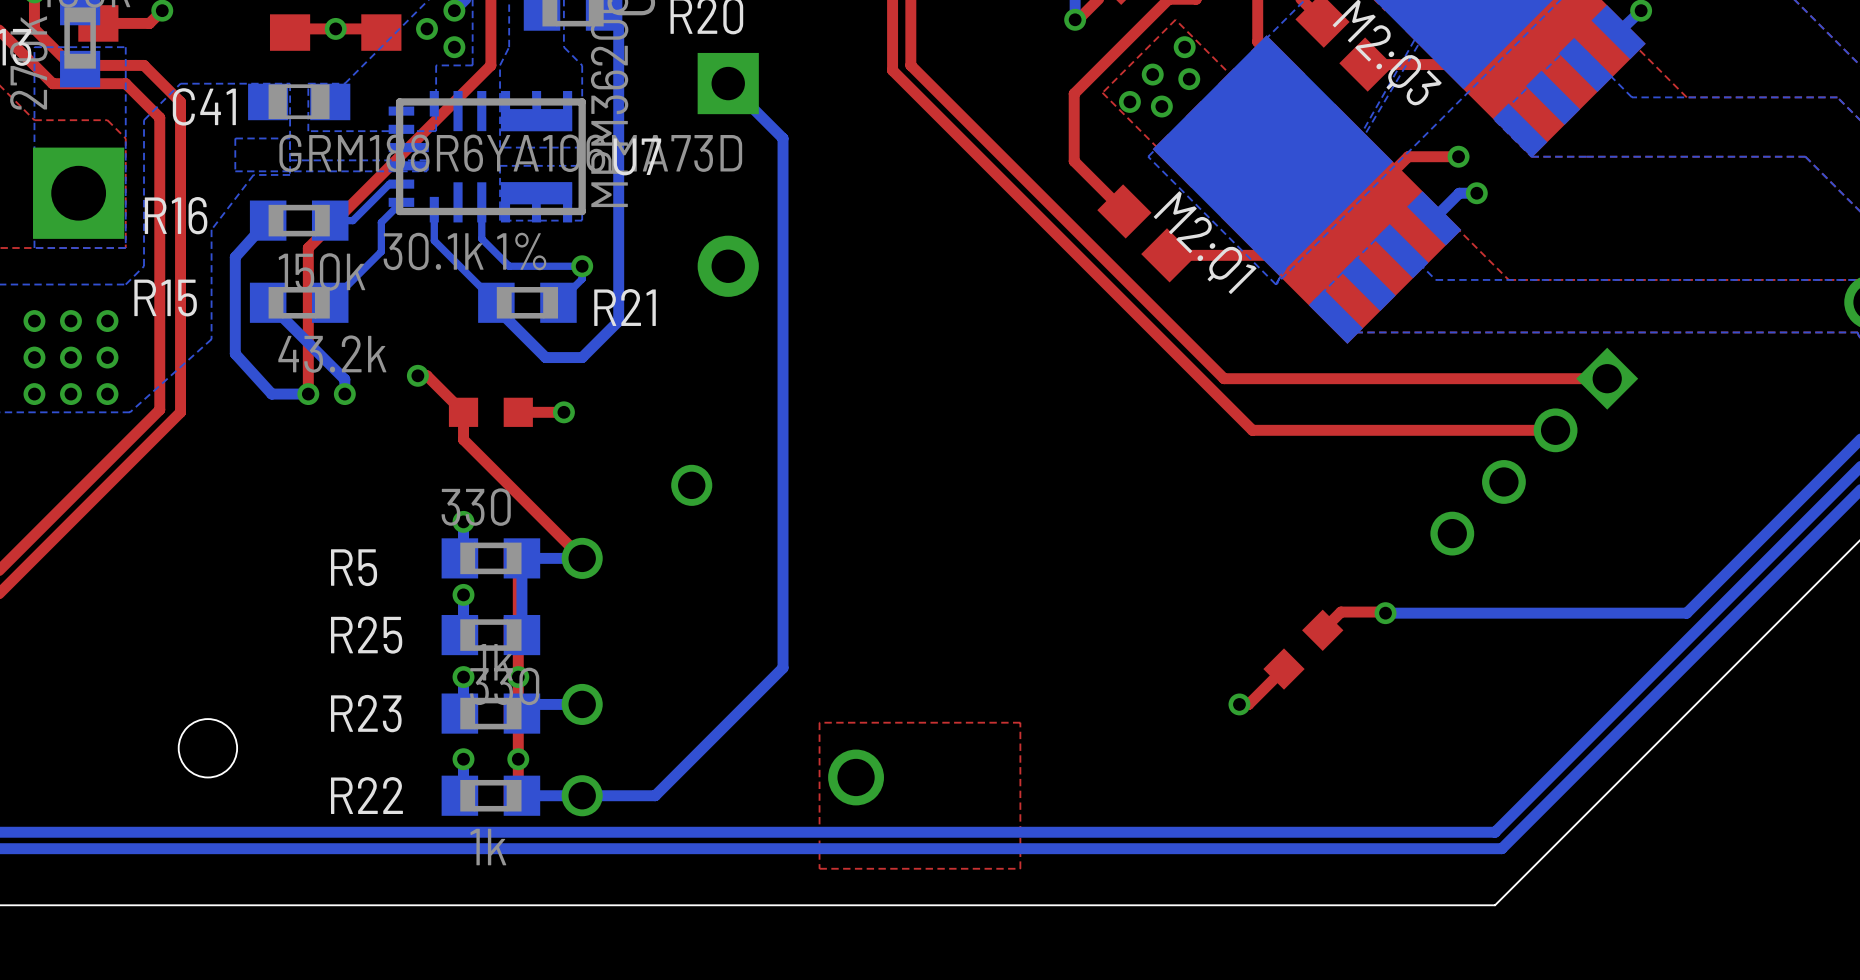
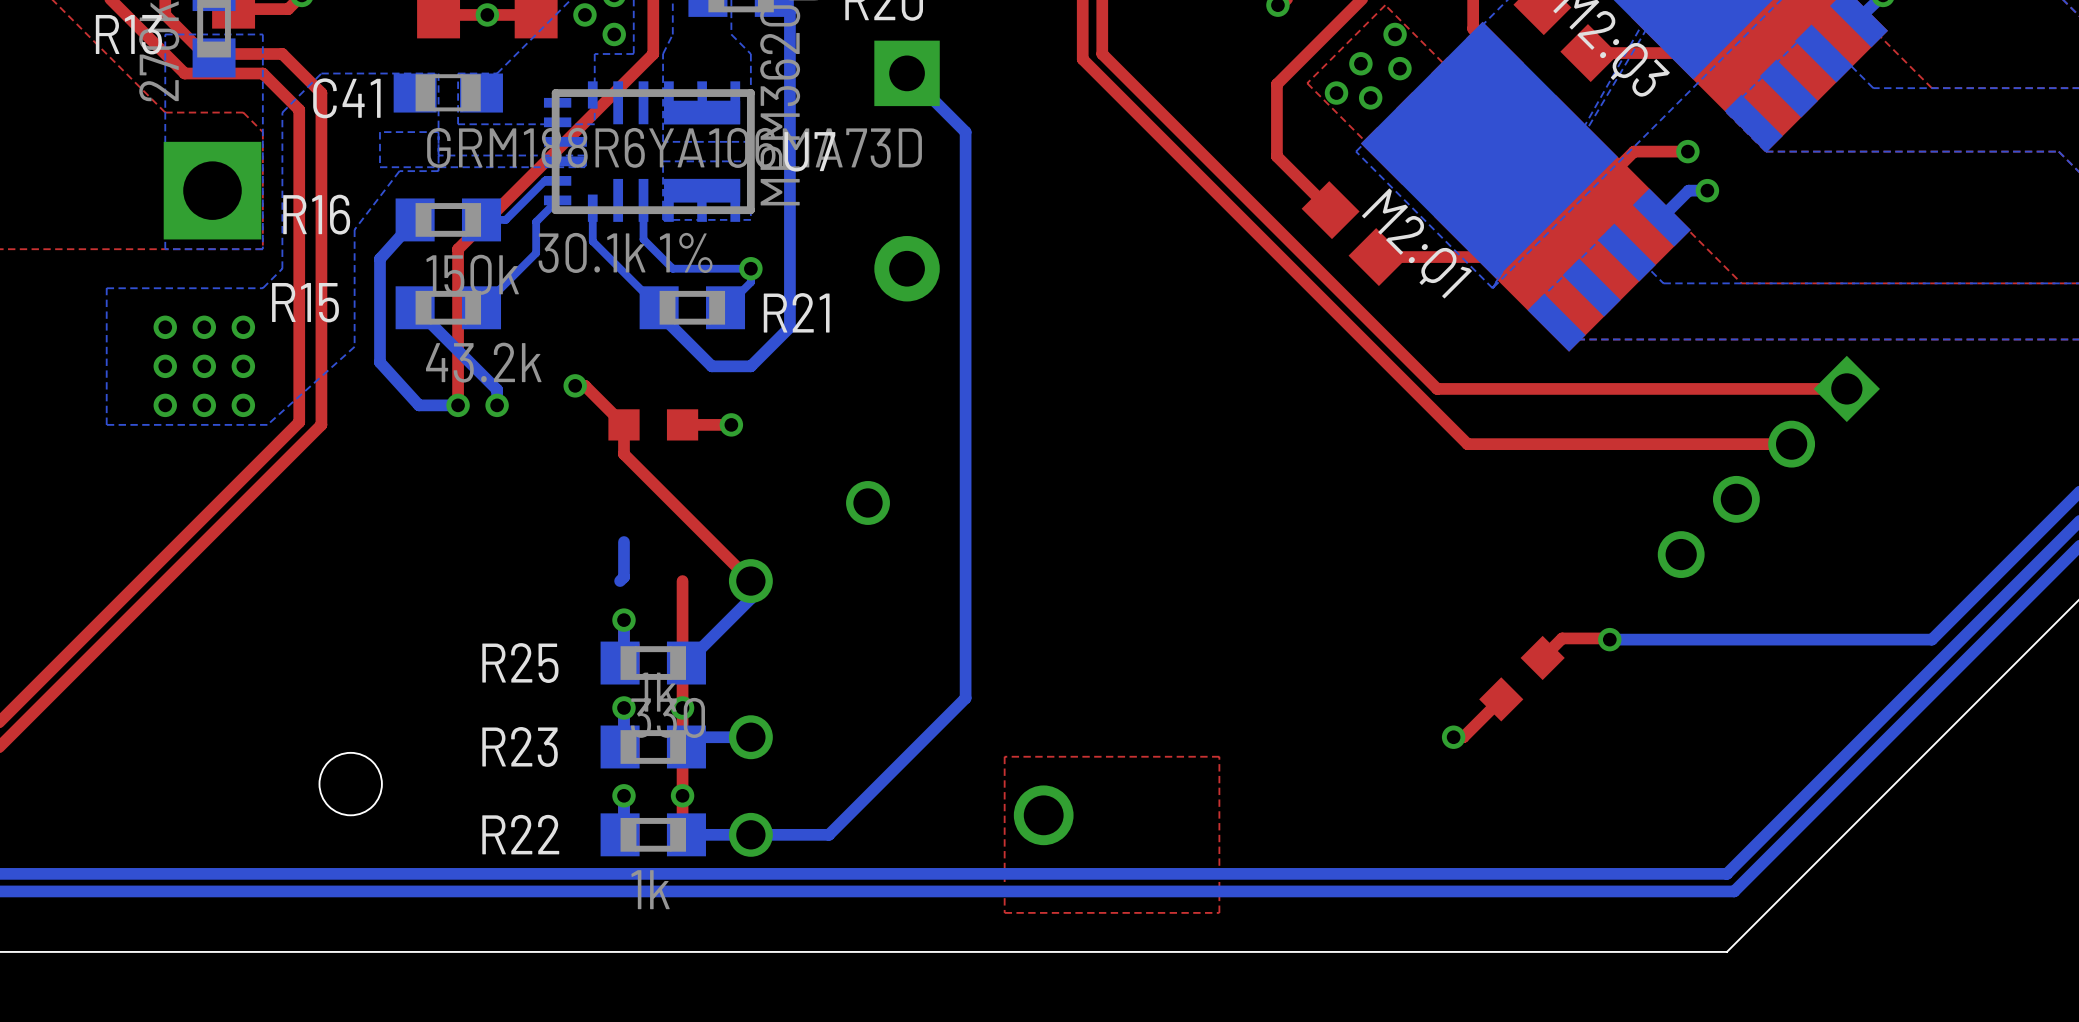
via: (463, 521) -> none
R5: 330 (490, 558) -> none
bottom track: (582, 558) (521, 558) (521, 635) -> (750, 581) (750, 598) (686, 663)

